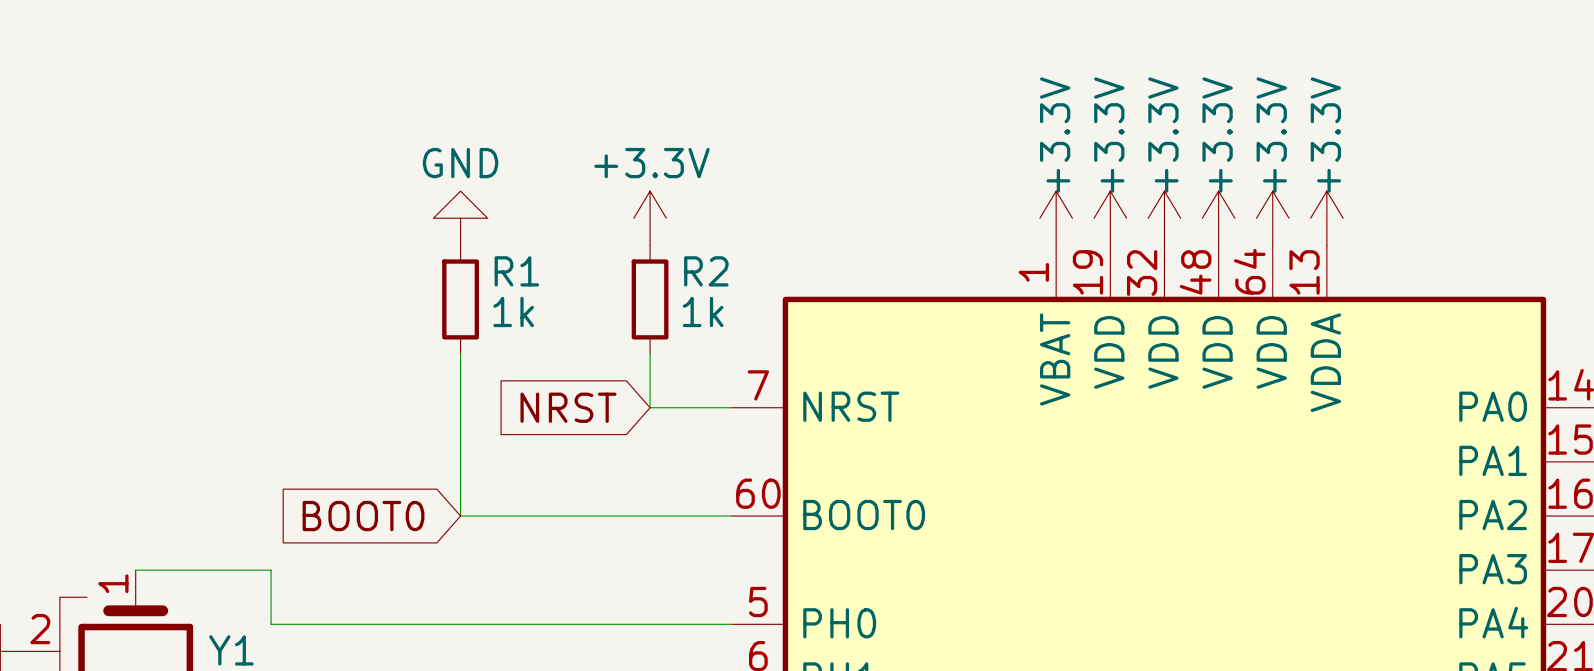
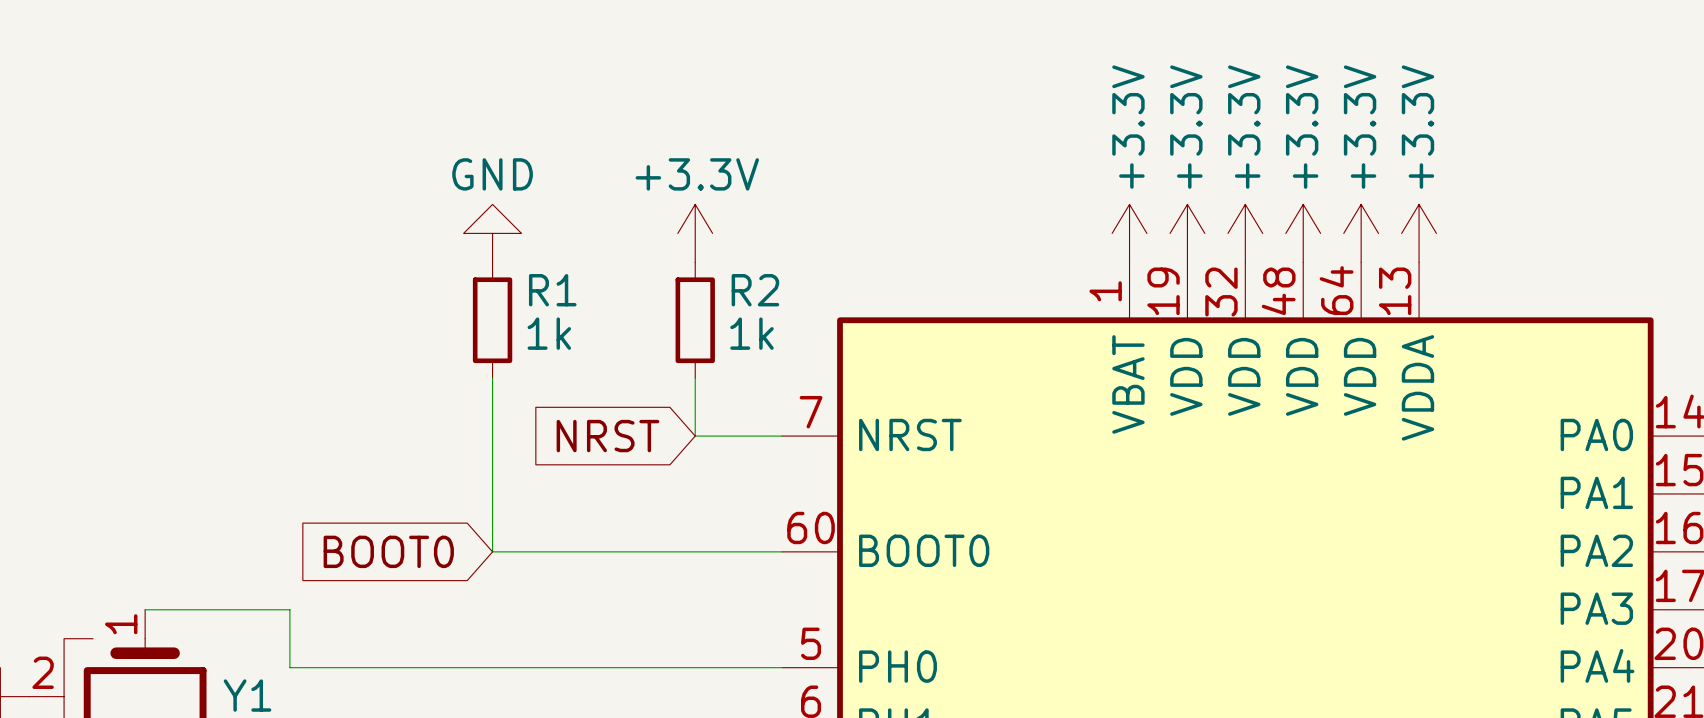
power symbol text position: +3.3V (1055, 135) -> +3.3V (1128, 127)
power symbol text position: +3.3V (1109, 135) -> +3.3V (1186, 127)
power symbol text position: +3.3V (1163, 135) -> +3.3V (1244, 127)
power symbol text position: +3.3V (1217, 135) -> +3.3V (1302, 127)
power symbol text position: +3.3V (1271, 135) -> +3.3V (1360, 127)
power symbol text position: +3.3V (1325, 135) -> +3.3V (1417, 127)

